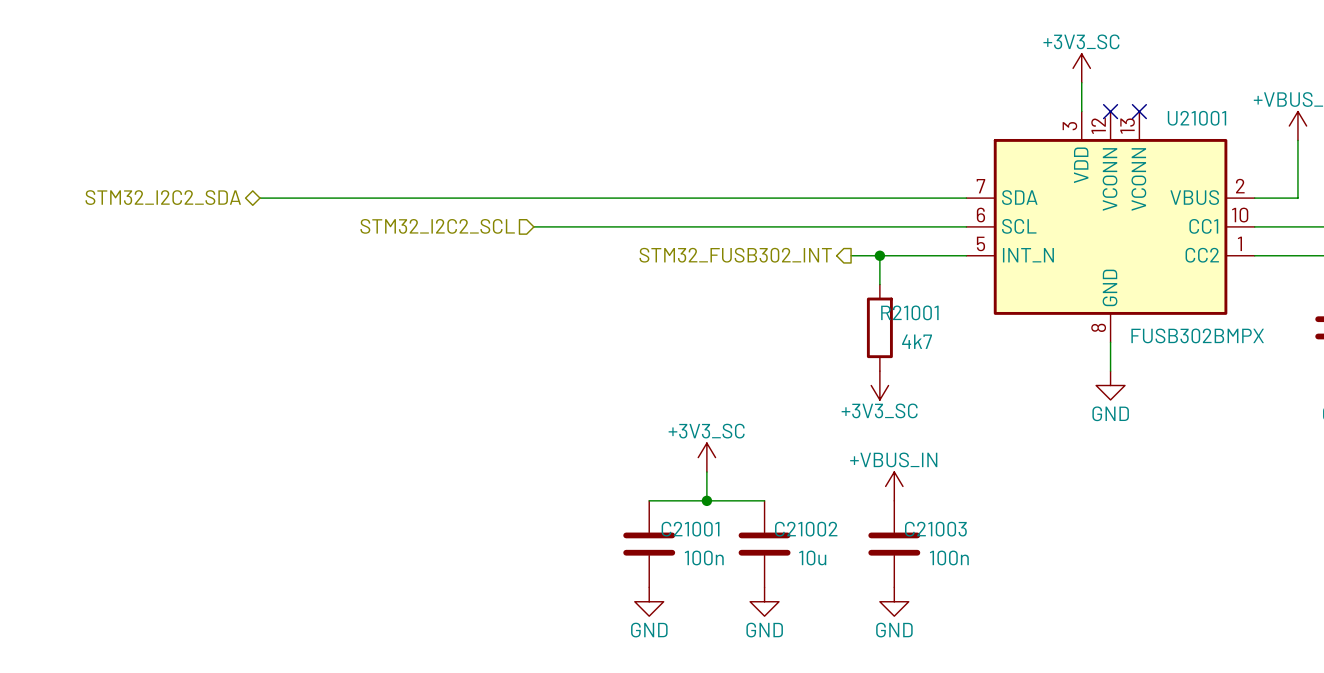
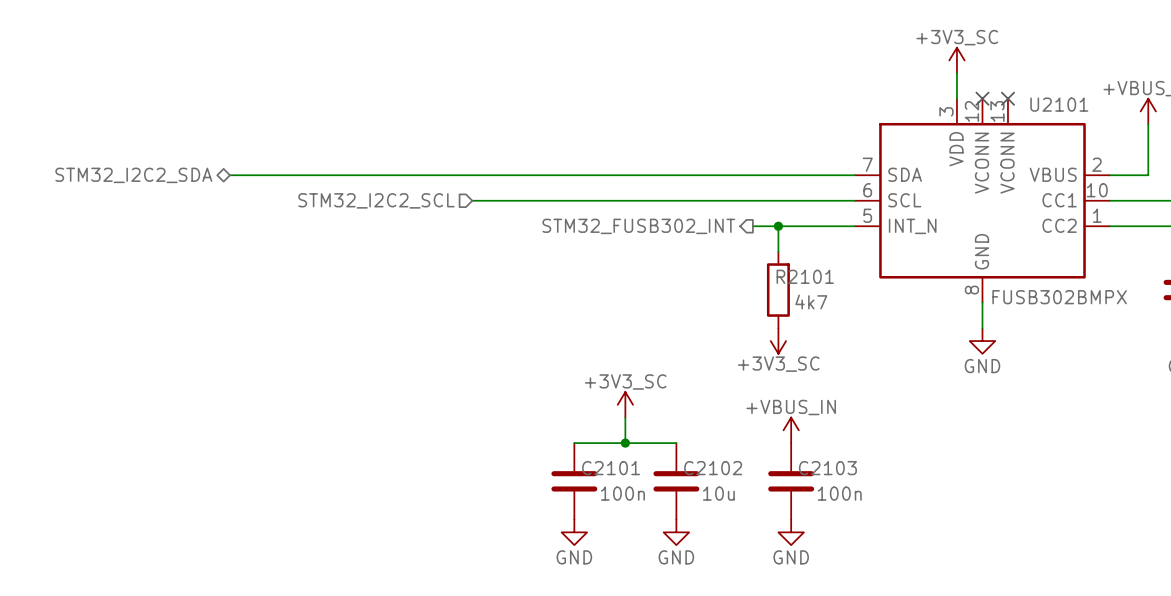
U21001 name: U21001 (1196, 118) -> U2101 (1059, 104)
R21001 name: R21001 (909, 312) -> R2101 (805, 276)
C21001 name: C21001 (690, 529) -> C2101 (611, 468)
C21002 name: C21002 (806, 529) -> C2102 (713, 468)
C21003 name: C21003 (935, 529) -> C2103 (827, 468)

